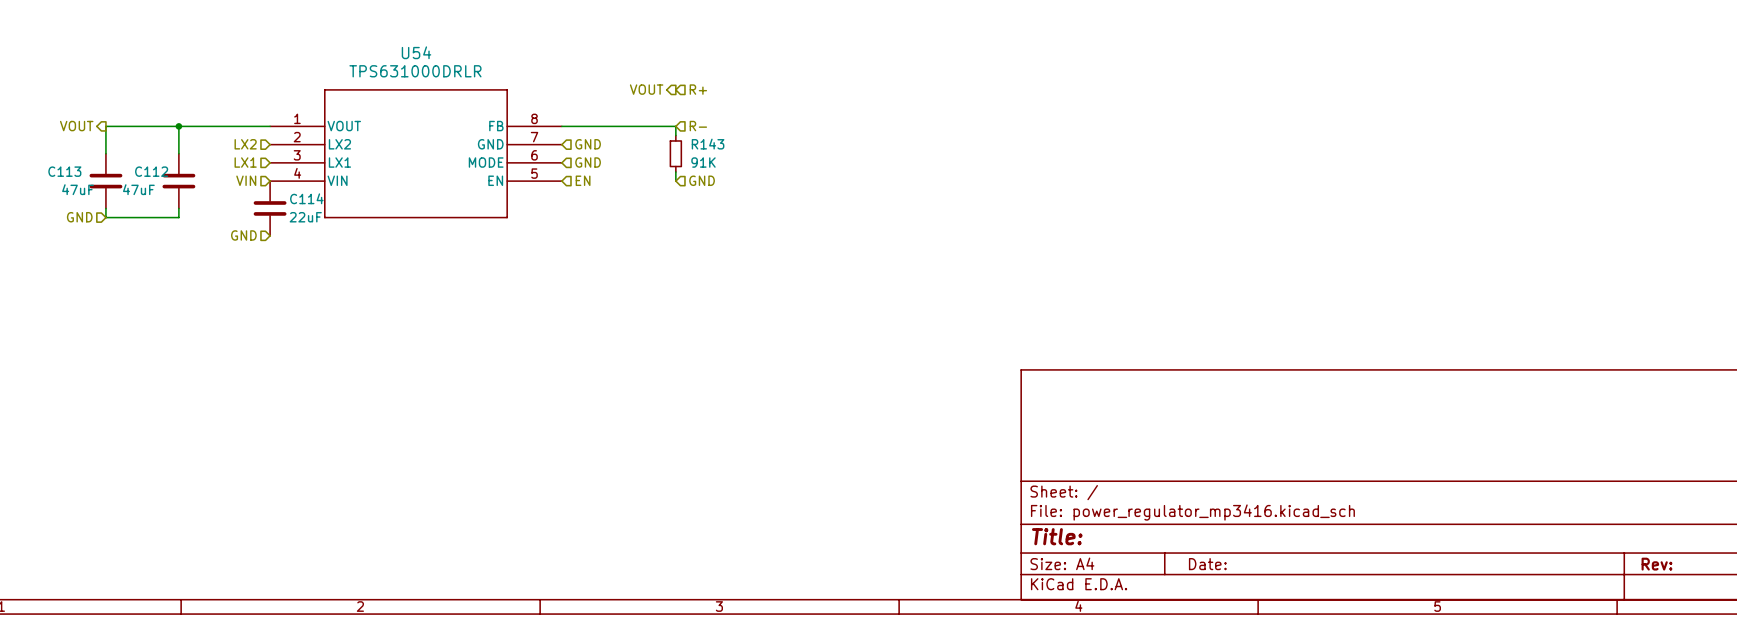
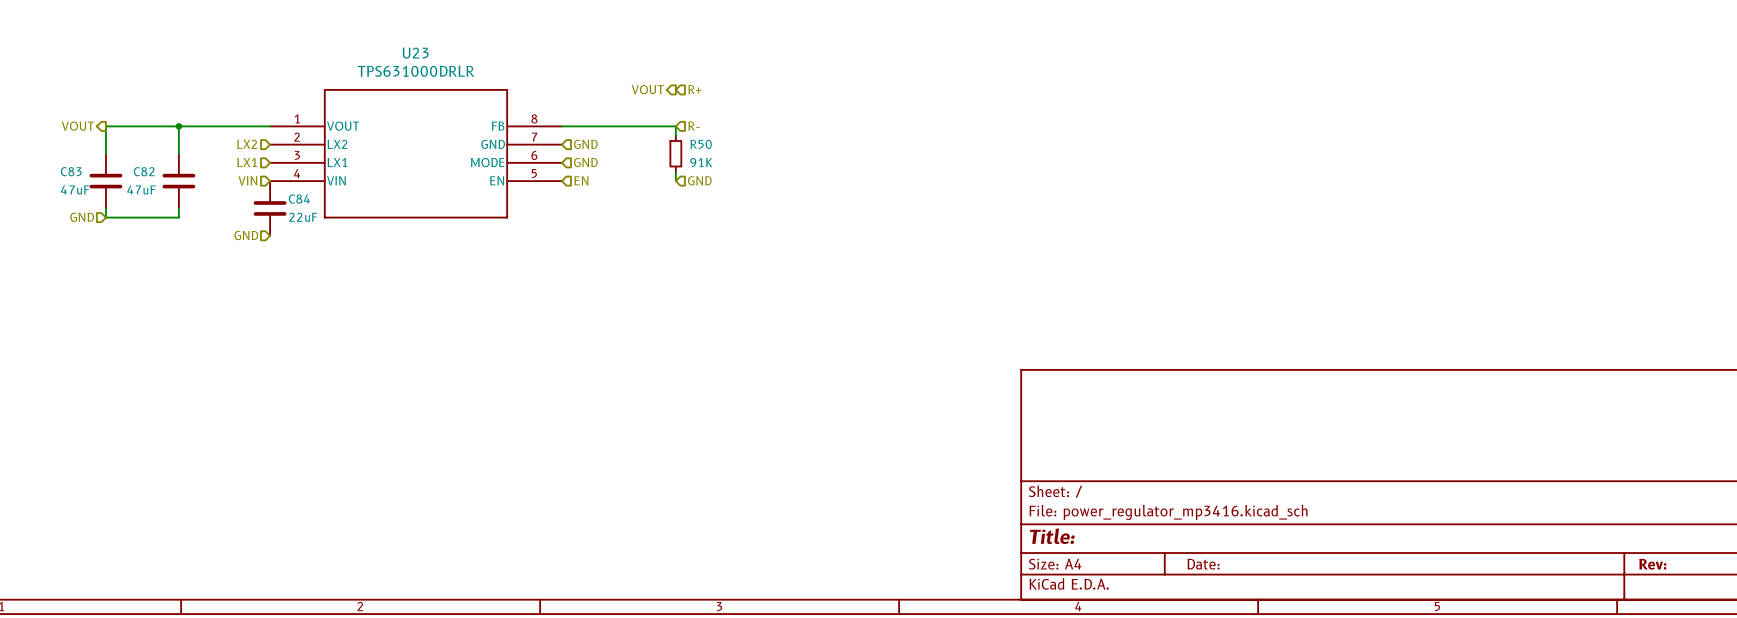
U54 name: U54 (416, 52) -> U23 (415, 53)
R143 name: R143 (708, 144) -> R50 (701, 144)
C113 name: C113 (64, 171) -> C83 (71, 171)
C112 name: C112 (151, 171) -> C82 (144, 171)
C114 name: C114 (306, 198) -> C84 (299, 199)

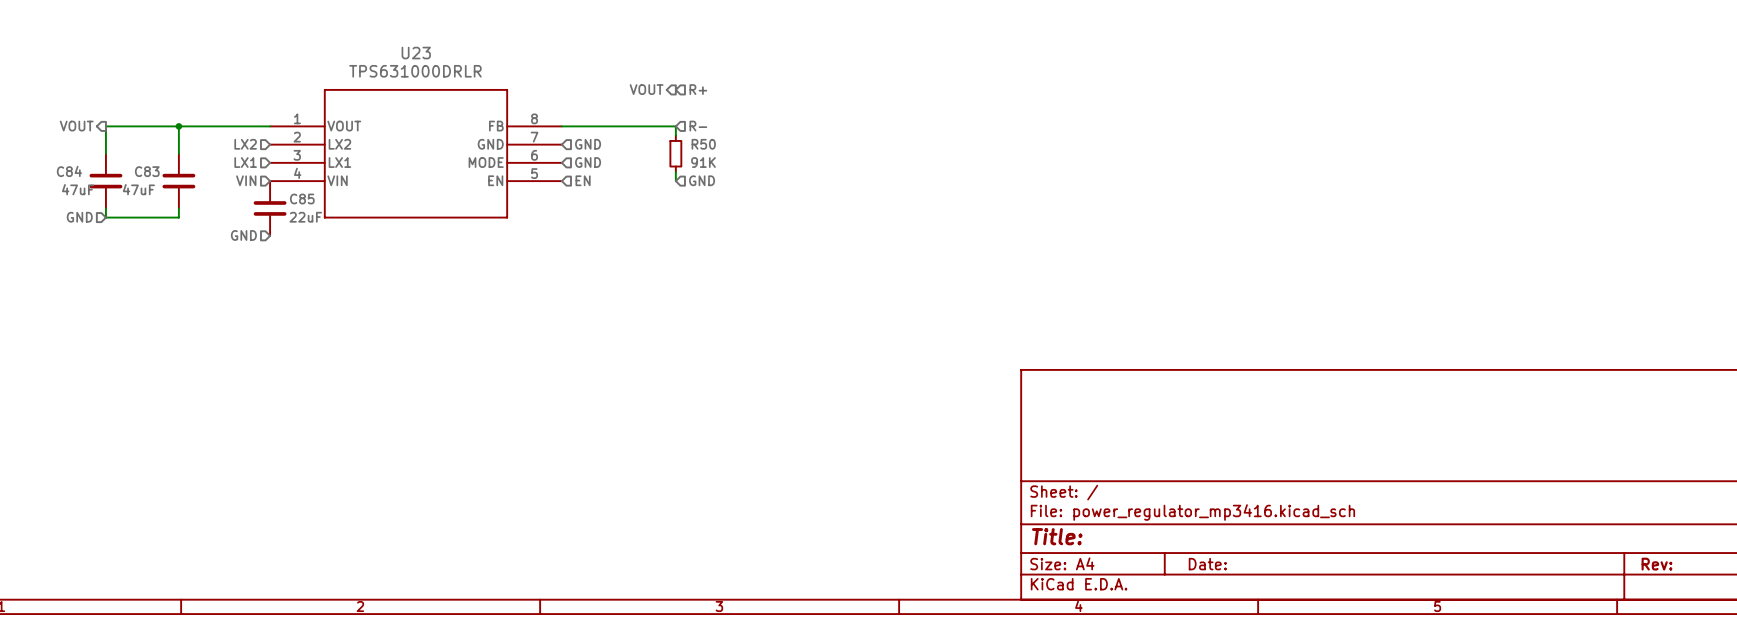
C83 name: C83 (71, 171) -> C84 (69, 171)
C82 name: C82 (144, 171) -> C83 (147, 171)
C84 name: C84 (299, 199) -> C85 (302, 199)

